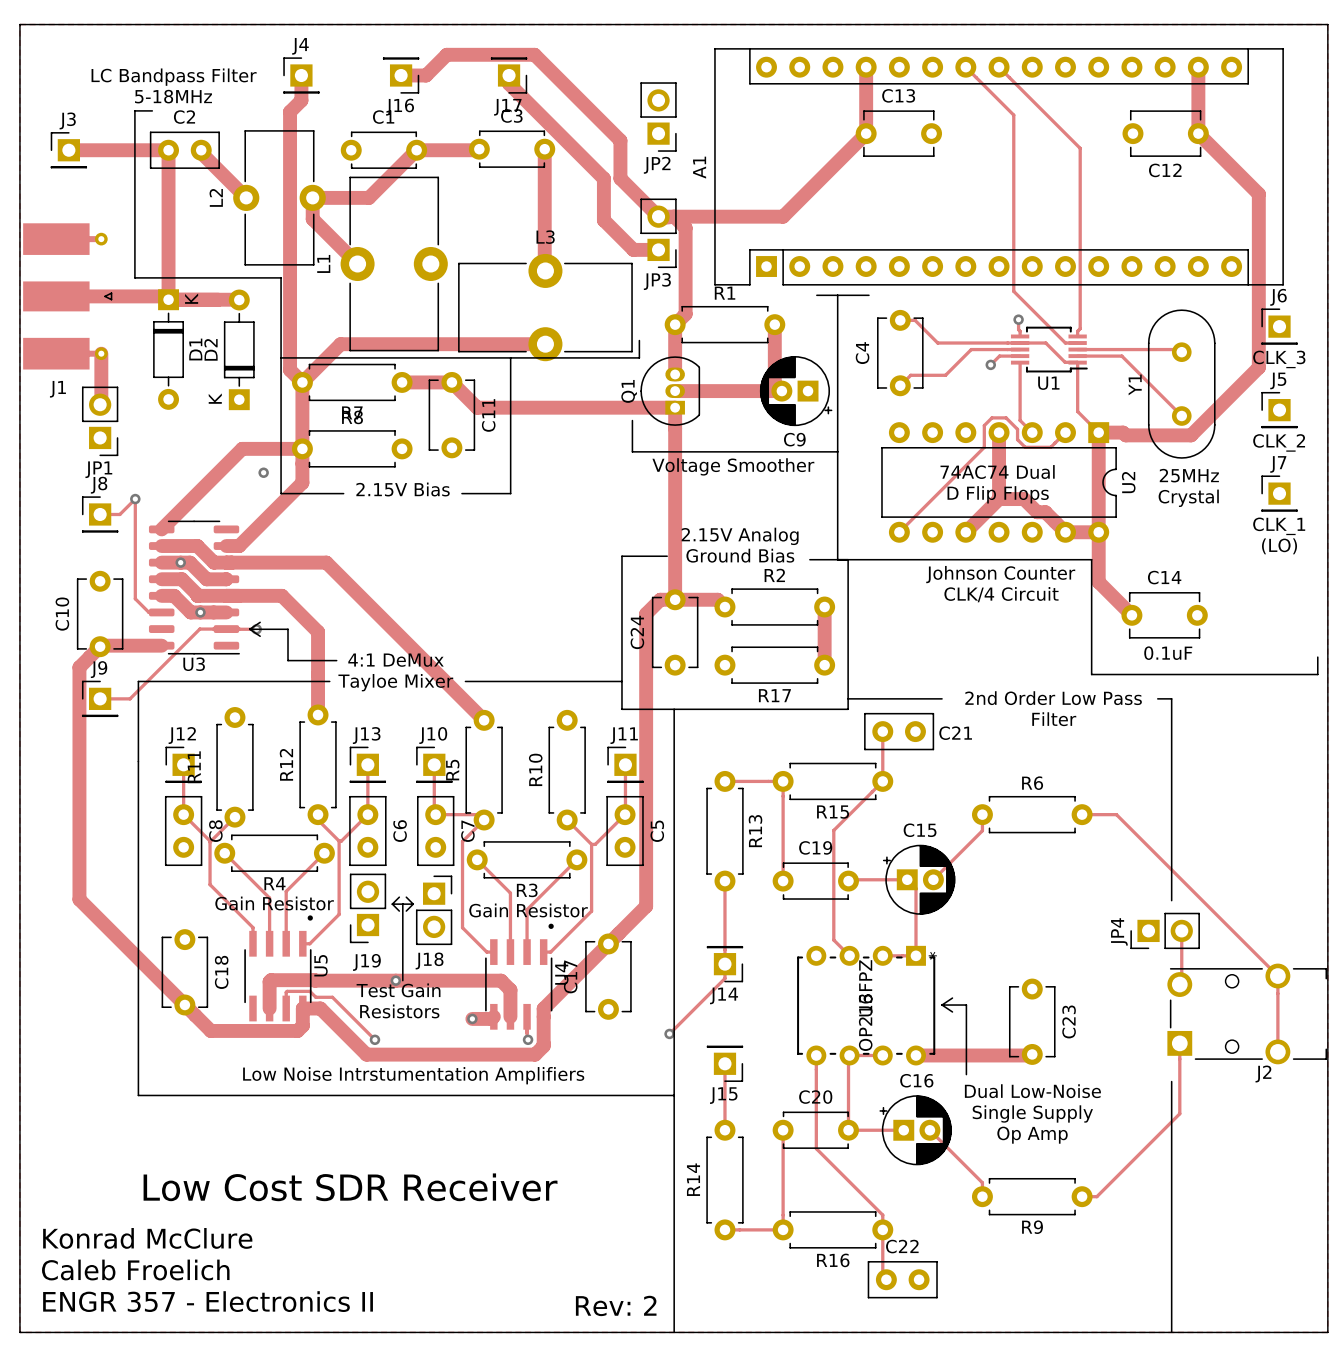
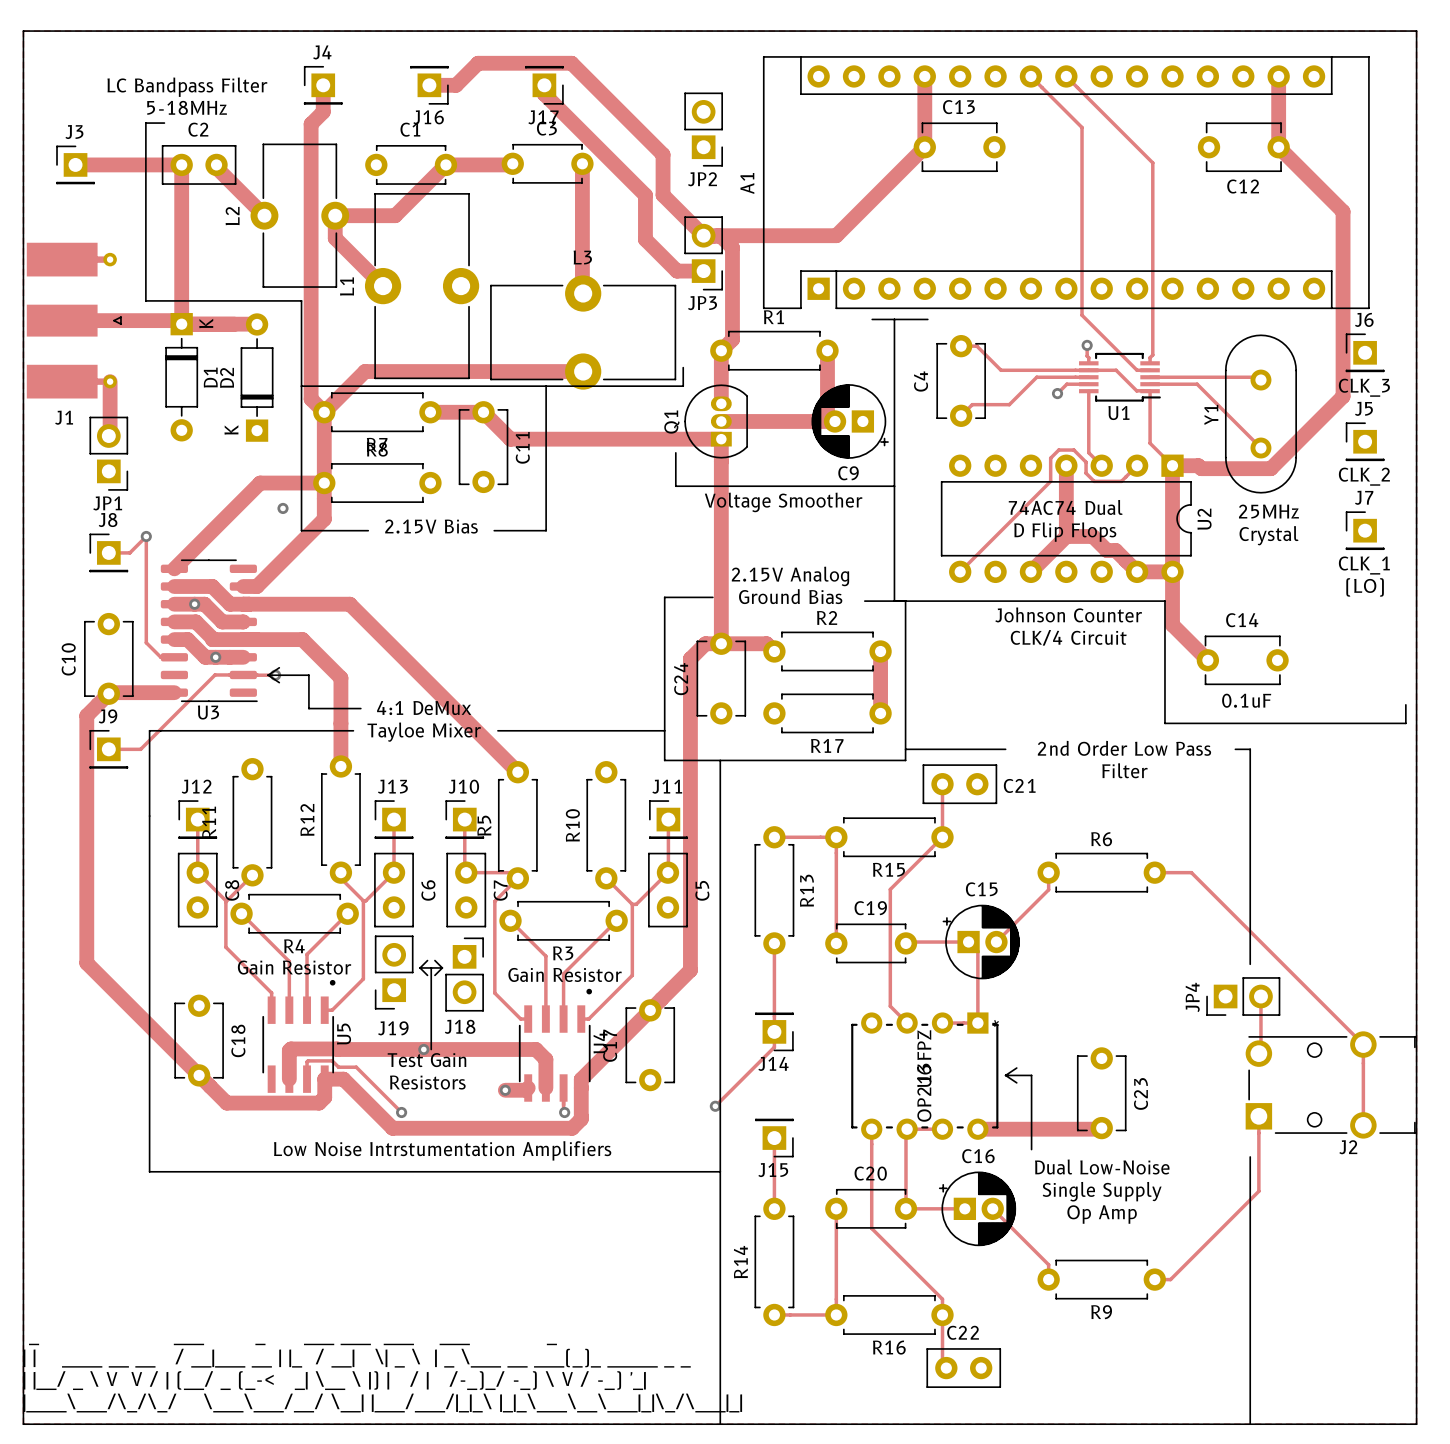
text: Low Cost SDR Receiver (350, 1187) -> none
text: Konrad McClure (147, 1238) -> none
text: none -> _ ___ _ ___ ___ ___ ___ _ (292, 1344)
text: Caleb Froelich (135, 1270) -> none
text: none -> | | ____ __ __ / __|___ __ | |_ / __| \| _ \ | _ \___ __ ___(_)_ _____ _ _ (357, 1358)
text: none -> | |__/ _ \ V V / | (__/ _ (_-< _| \__ \ |) | / | /-_)_/ -_) \ V / -_) '_| (334, 1380)
text: ENGR 357 - Electronics II (208, 1301) -> none
text: Rev: 2 (616, 1305) -> none
text: none -> |____\___/\_/\_/ \___\___/__/ \__| |___/___/|_|_\ |_|_\___\__\___|_|\_/\___|_| (382, 1403)

